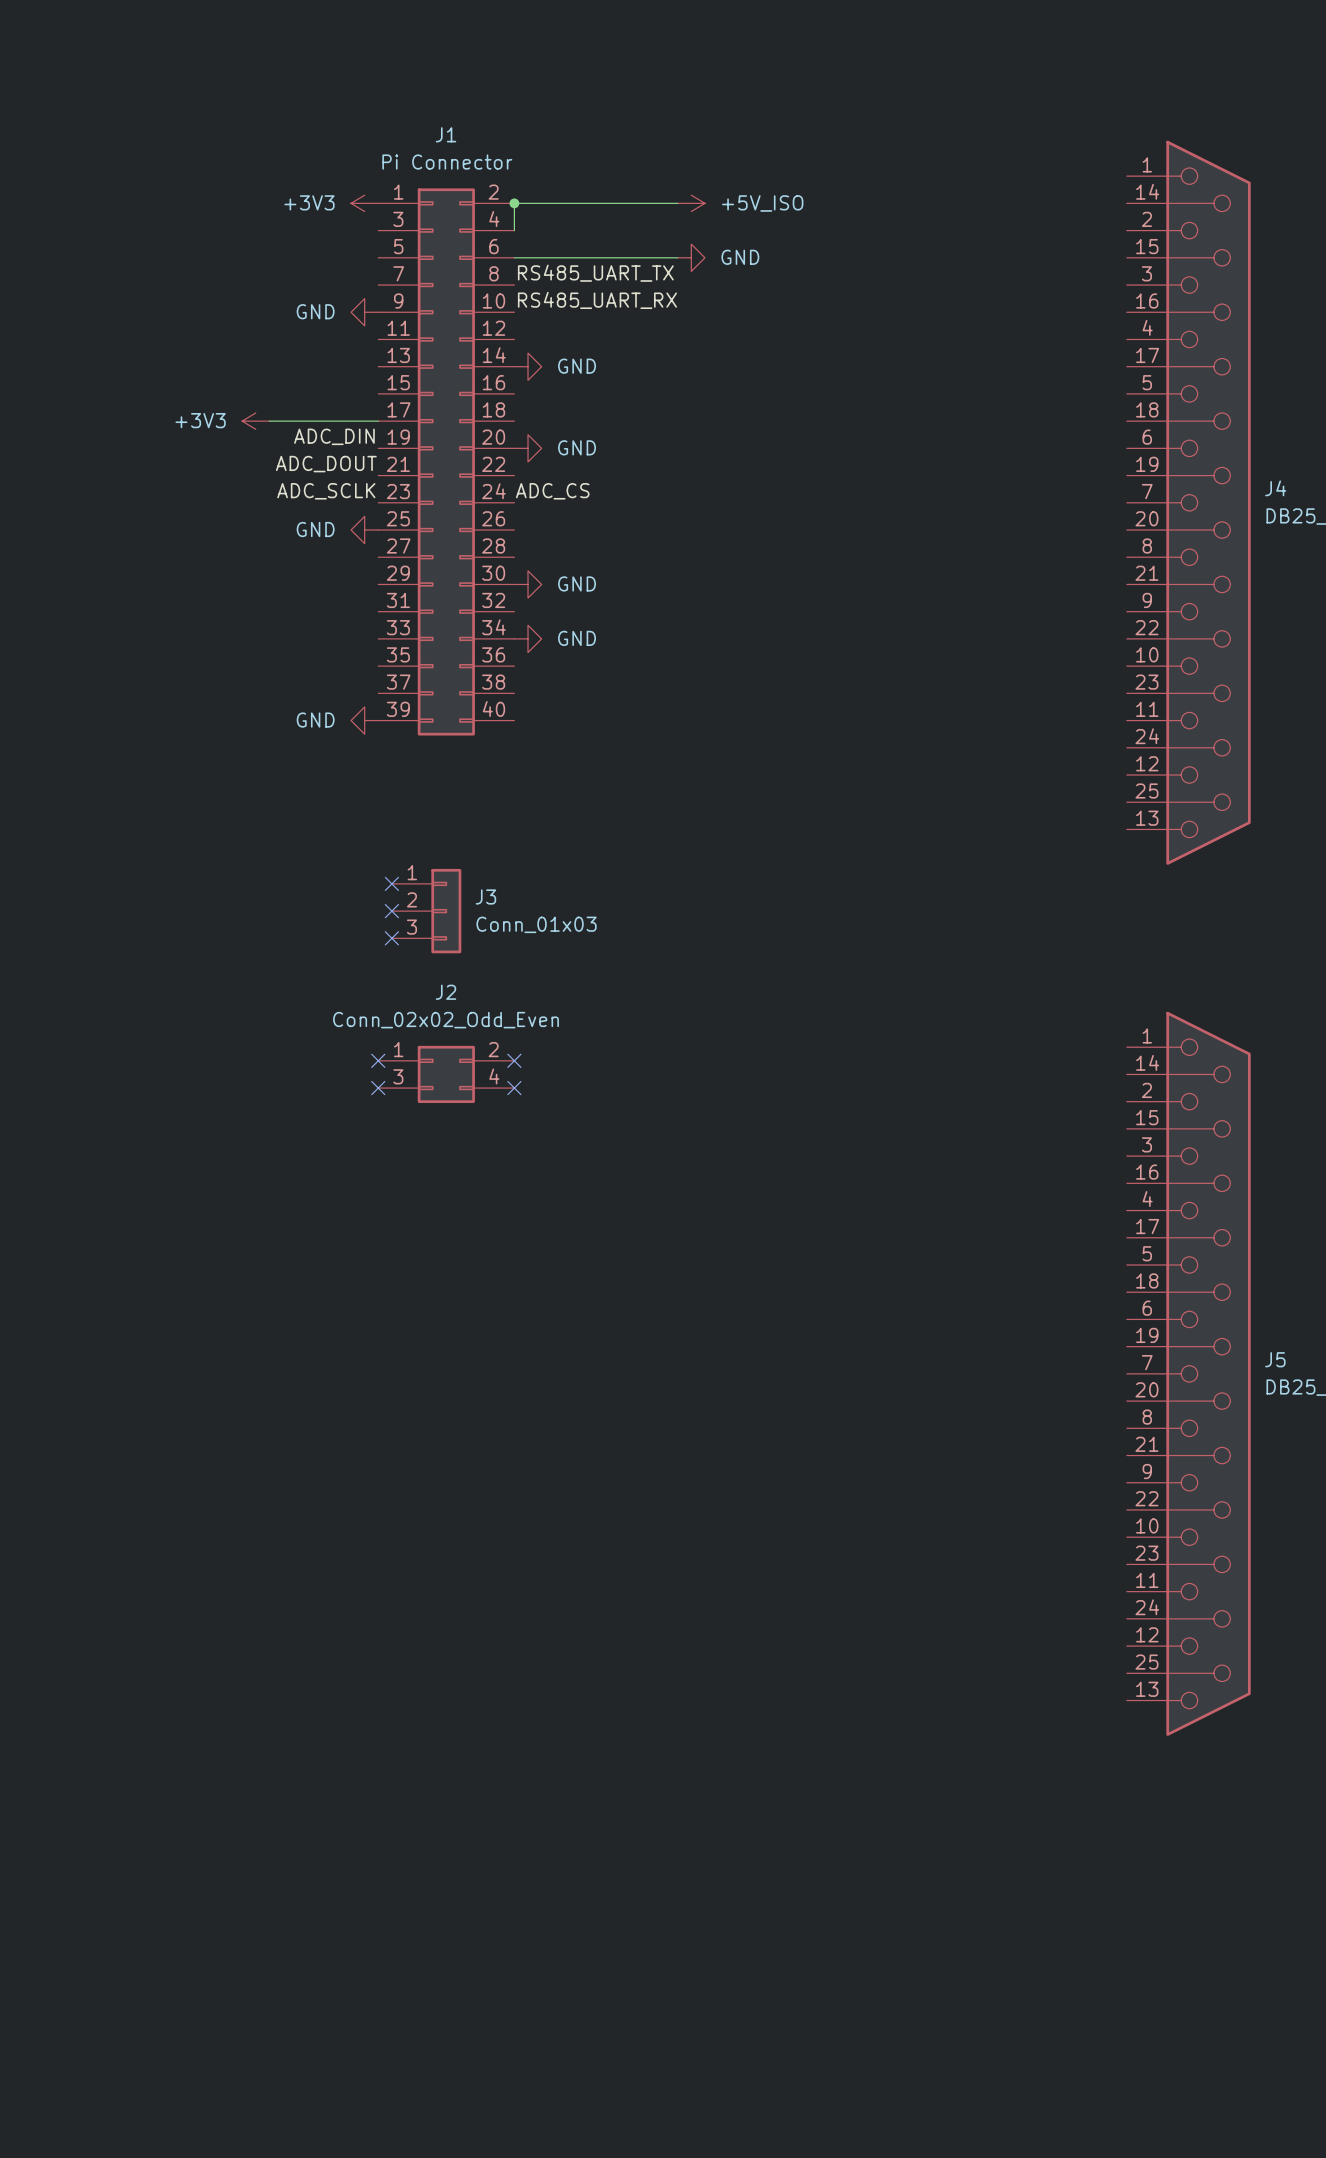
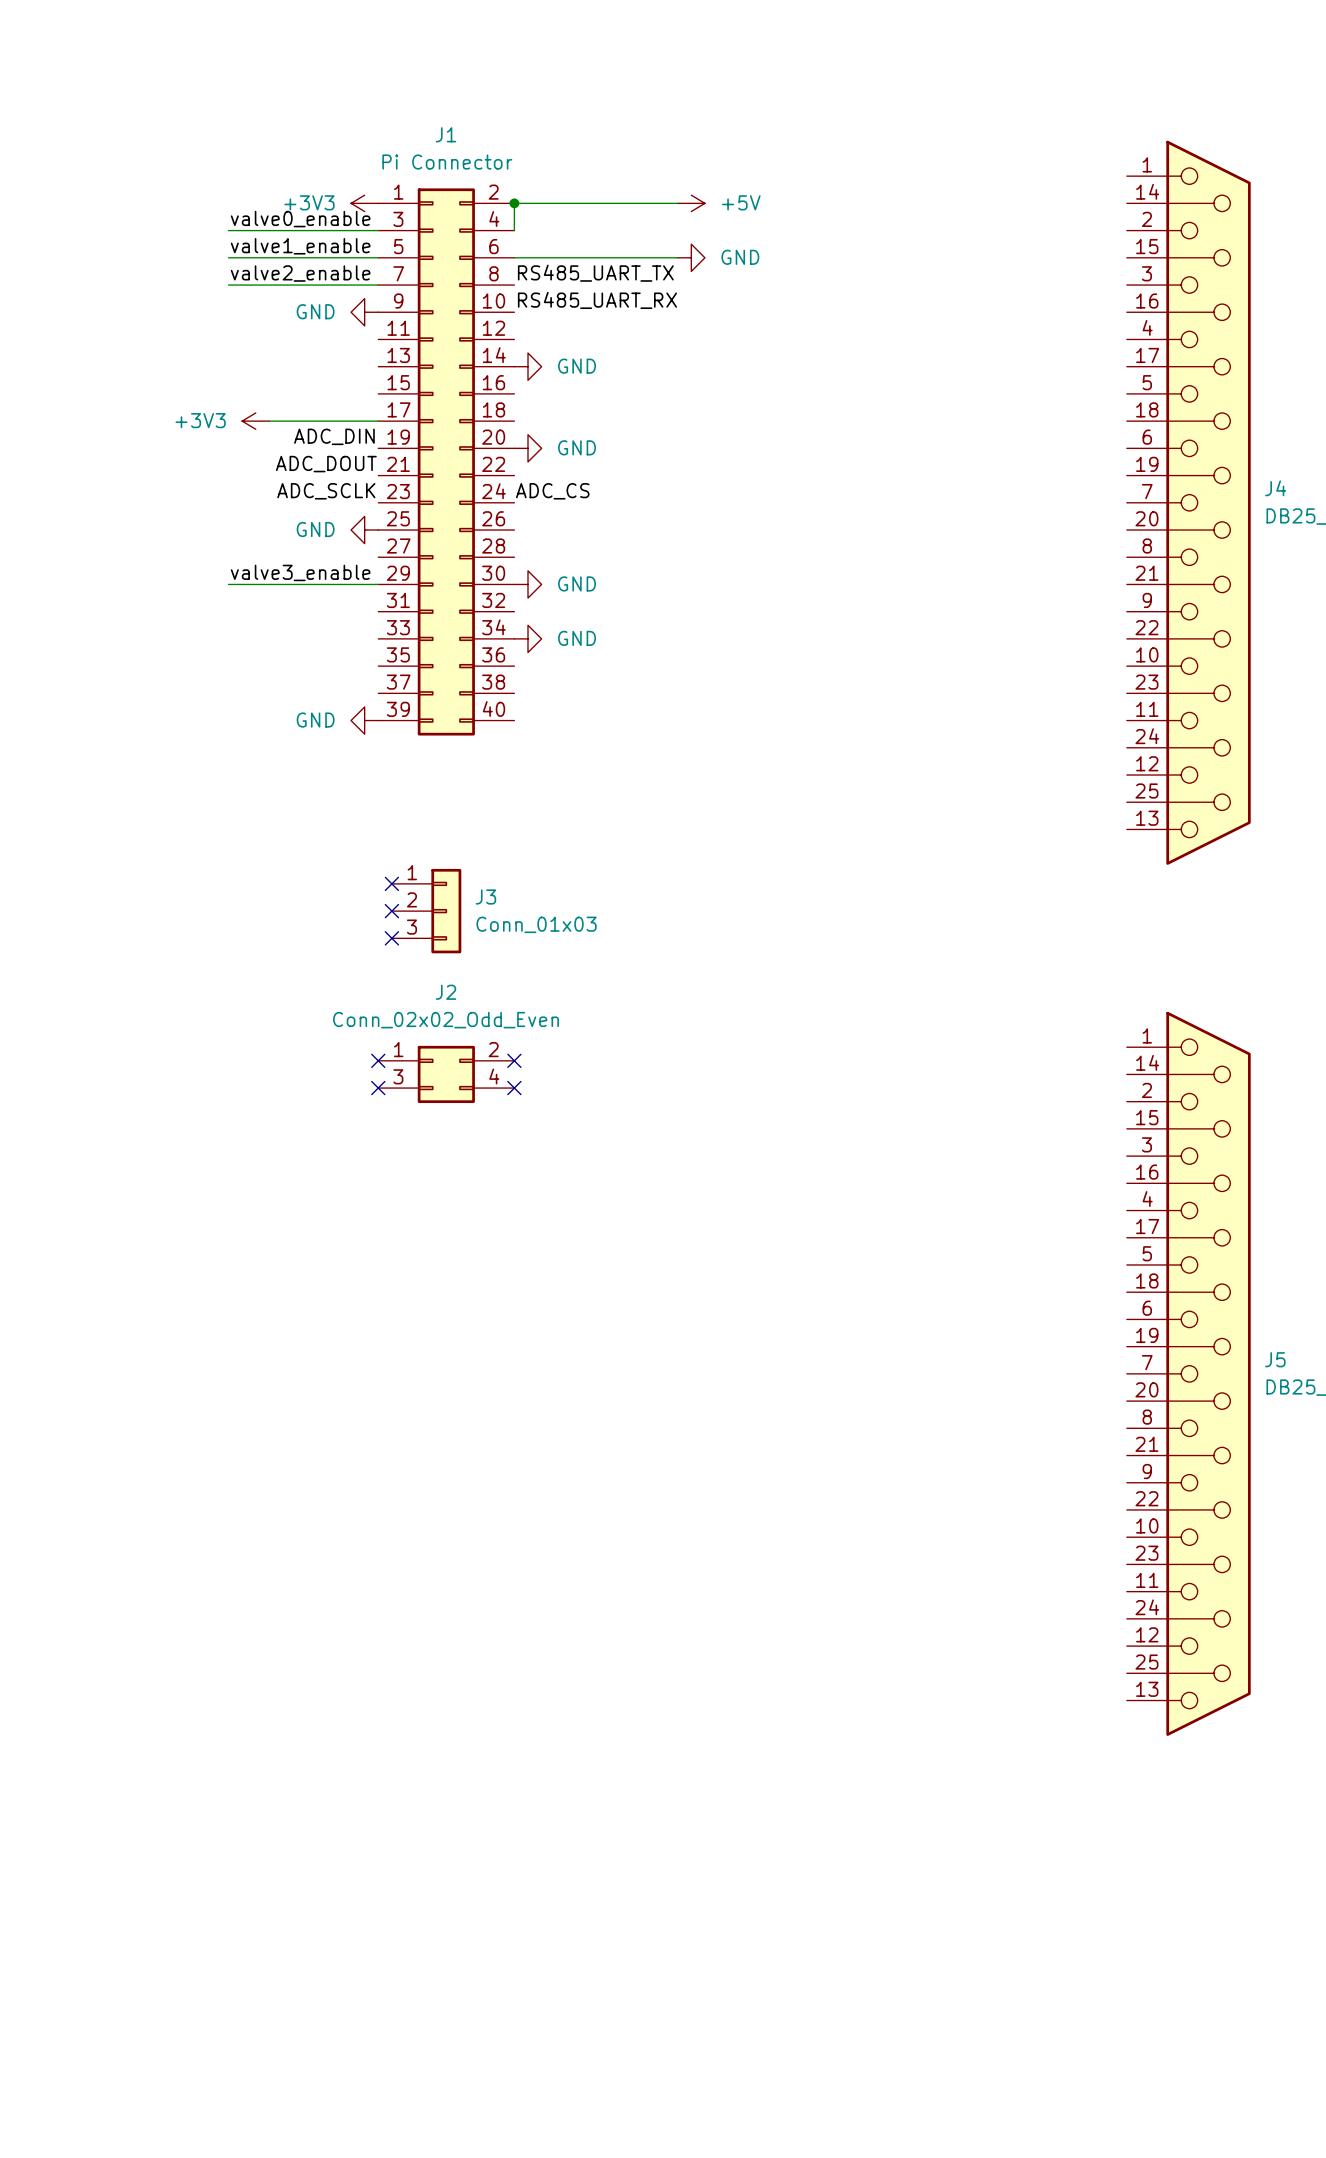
power symbol: +5V_ISO (691, 203) -> +5V (691, 203)
label: none -> valve0_enable (300, 219)
wire: none -> (228, 230) (378, 230)
label: none -> valve1_enable (300, 246)
wire: none -> (228, 257) (378, 257)
label: none -> valve2_enable (300, 273)
wire: none -> (228, 285) (378, 285)
label: none -> valve3_enable (300, 572)
wire: none -> (228, 584) (378, 584)

